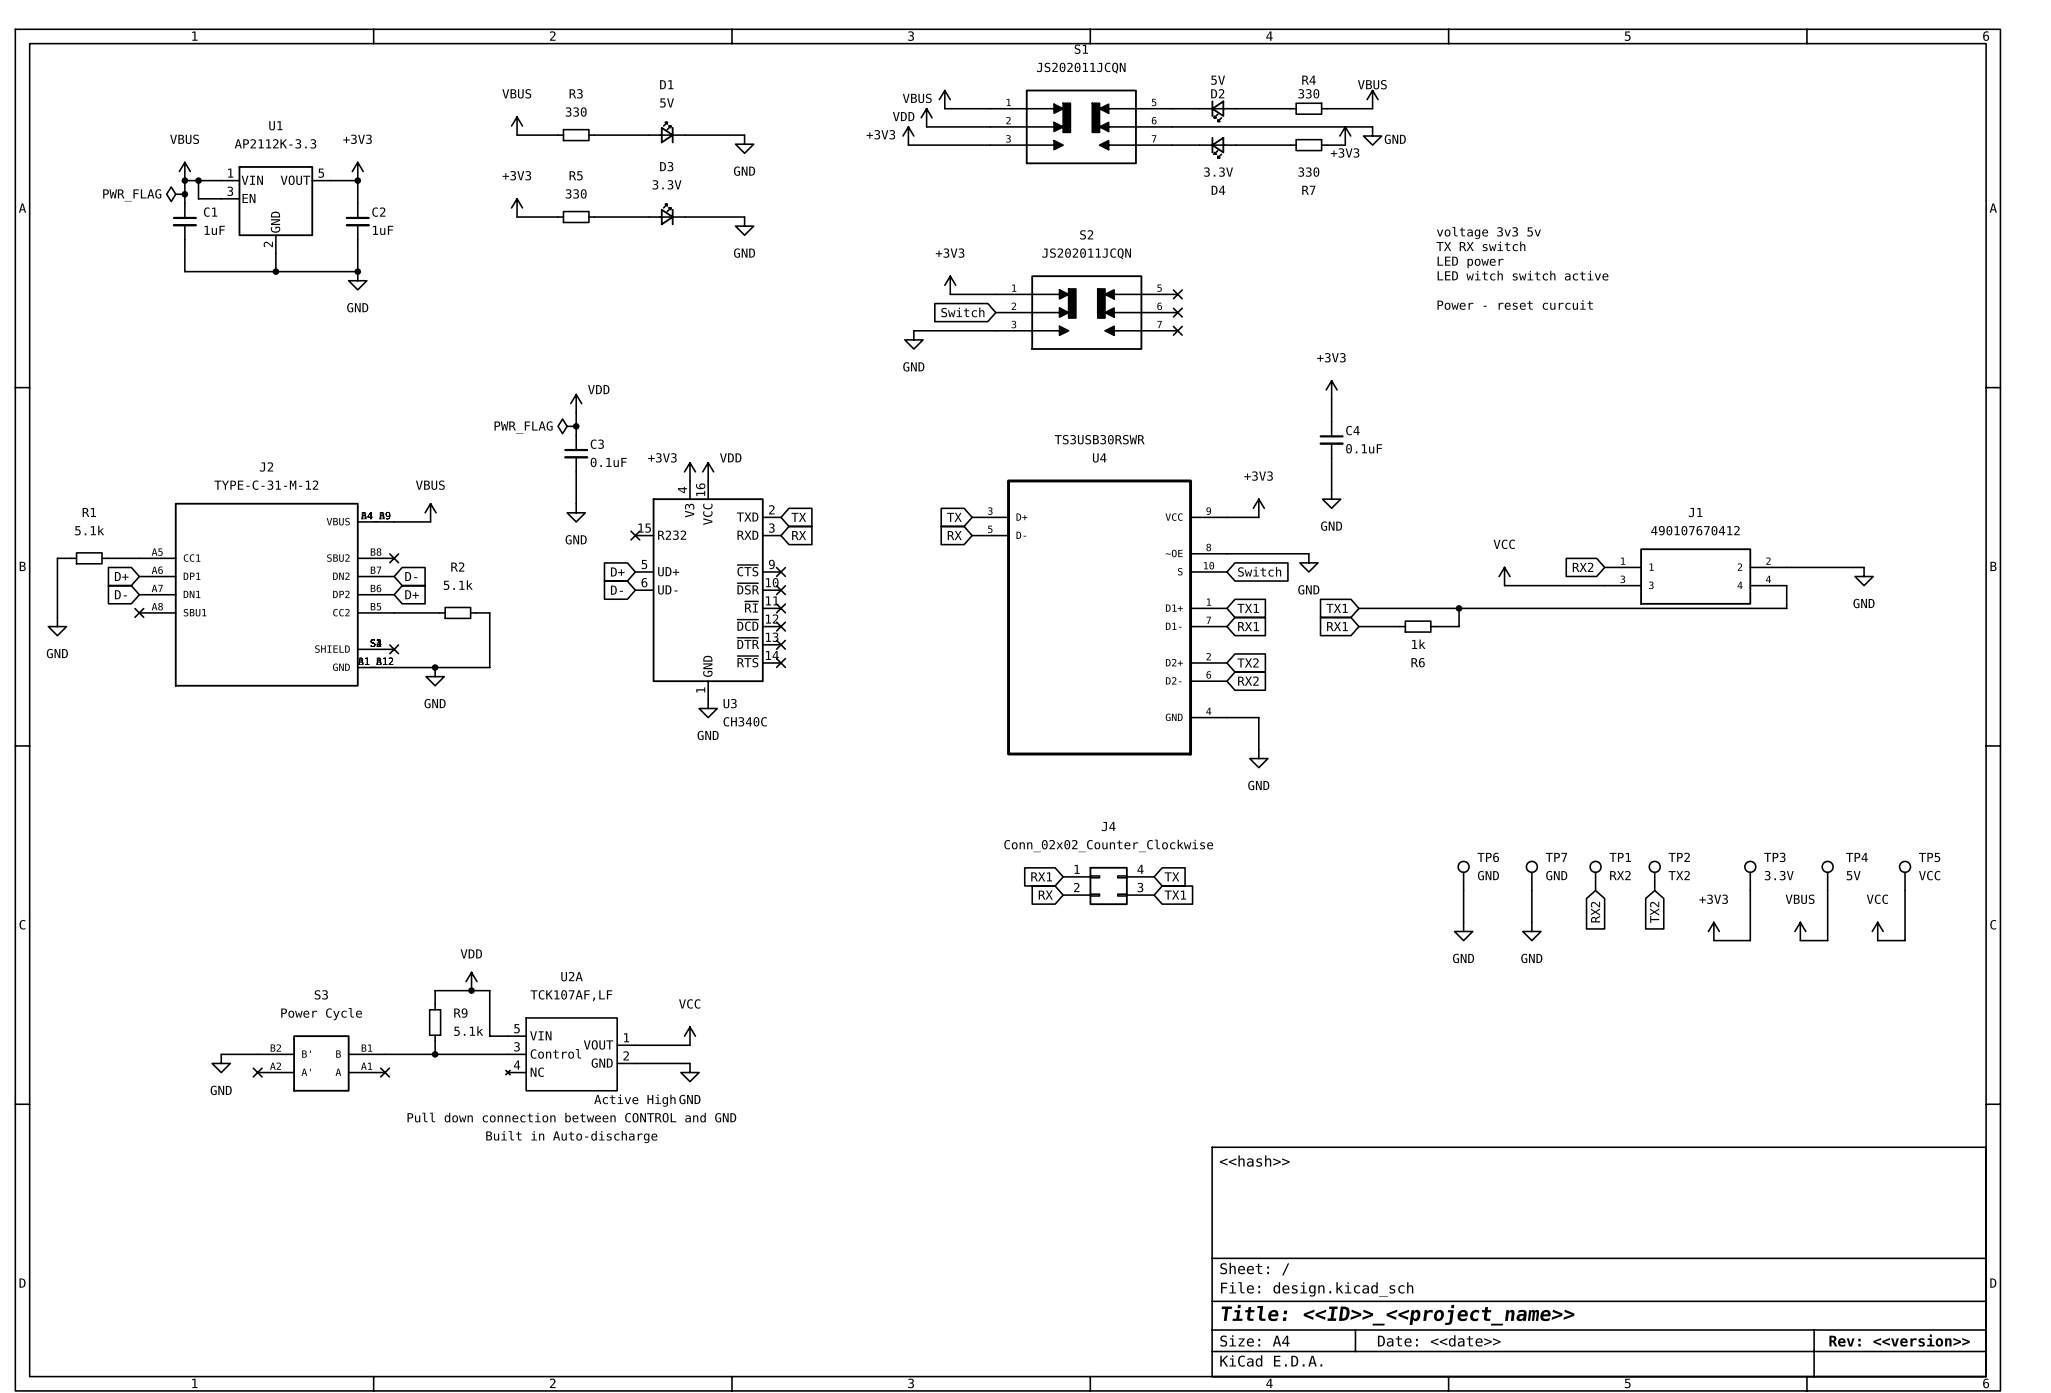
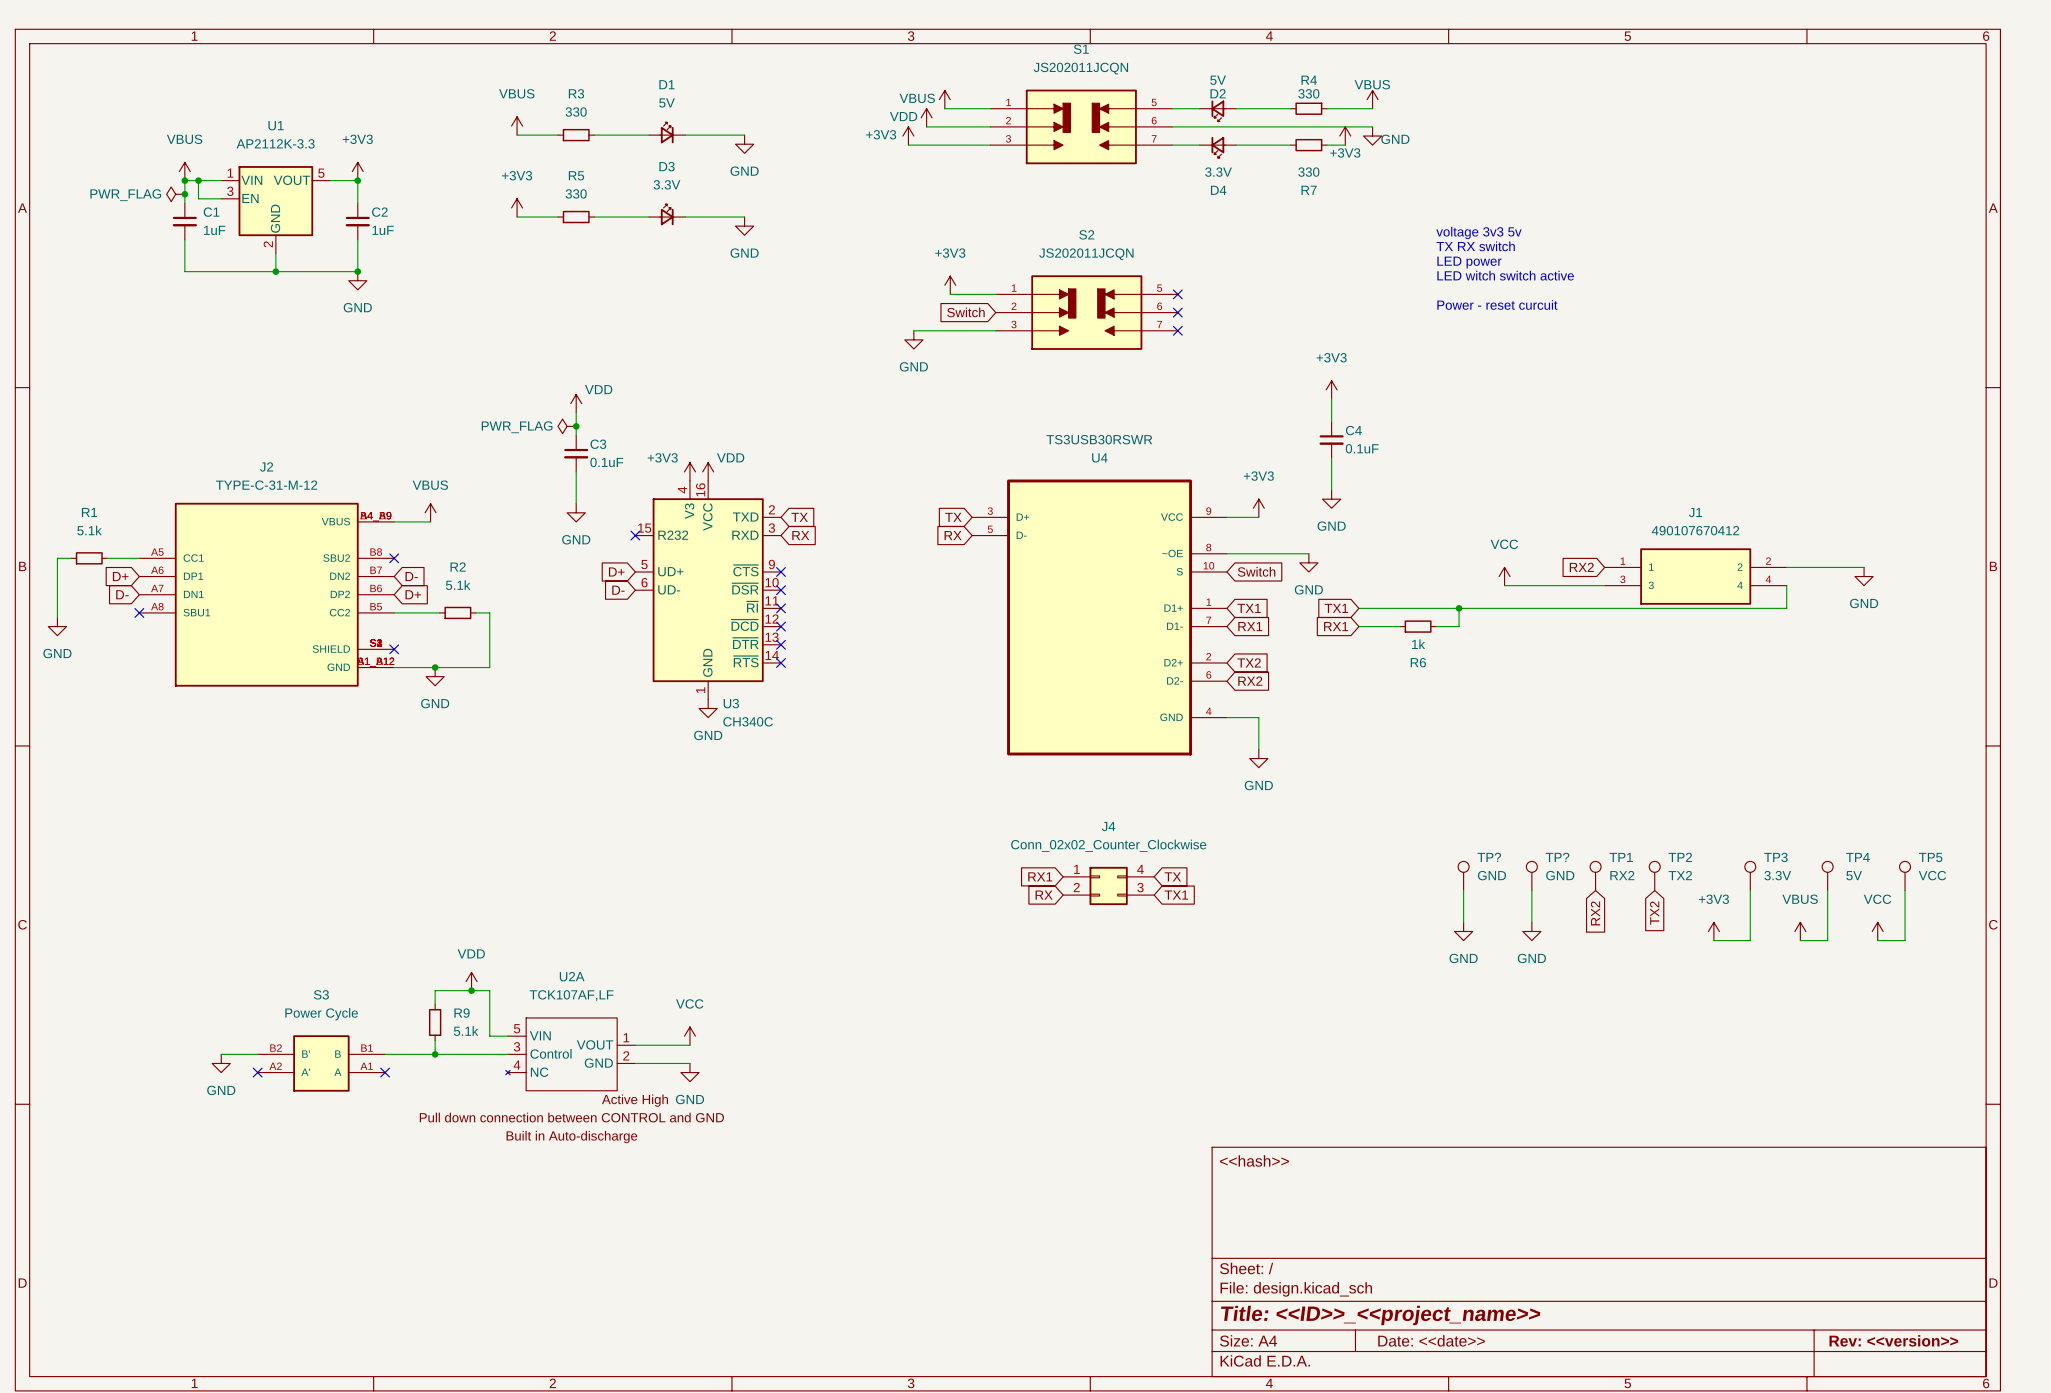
TP6 name: TP6 (1488, 857) -> TP? (1489, 857)
TP7 name: TP7 (1556, 857) -> TP? (1557, 857)

